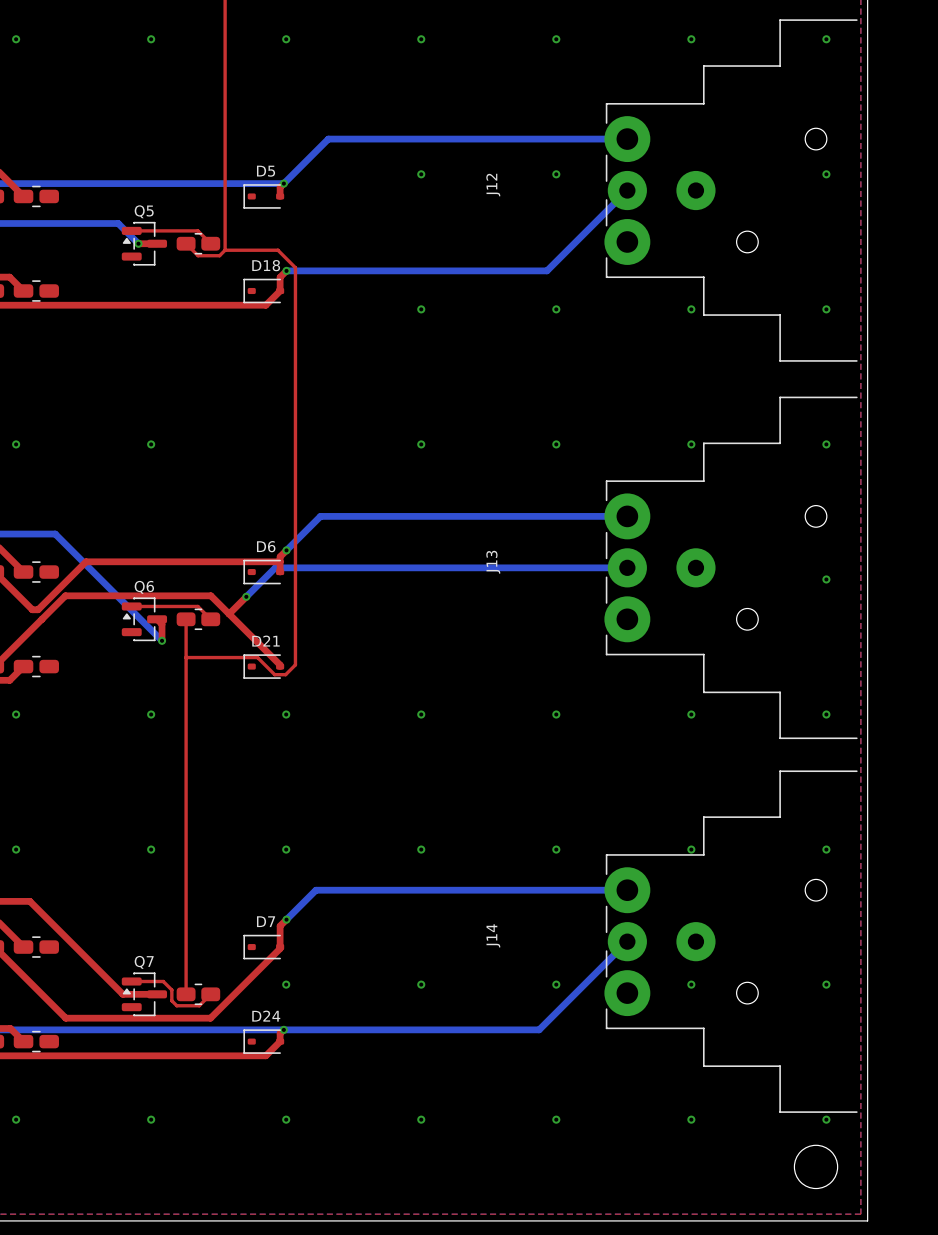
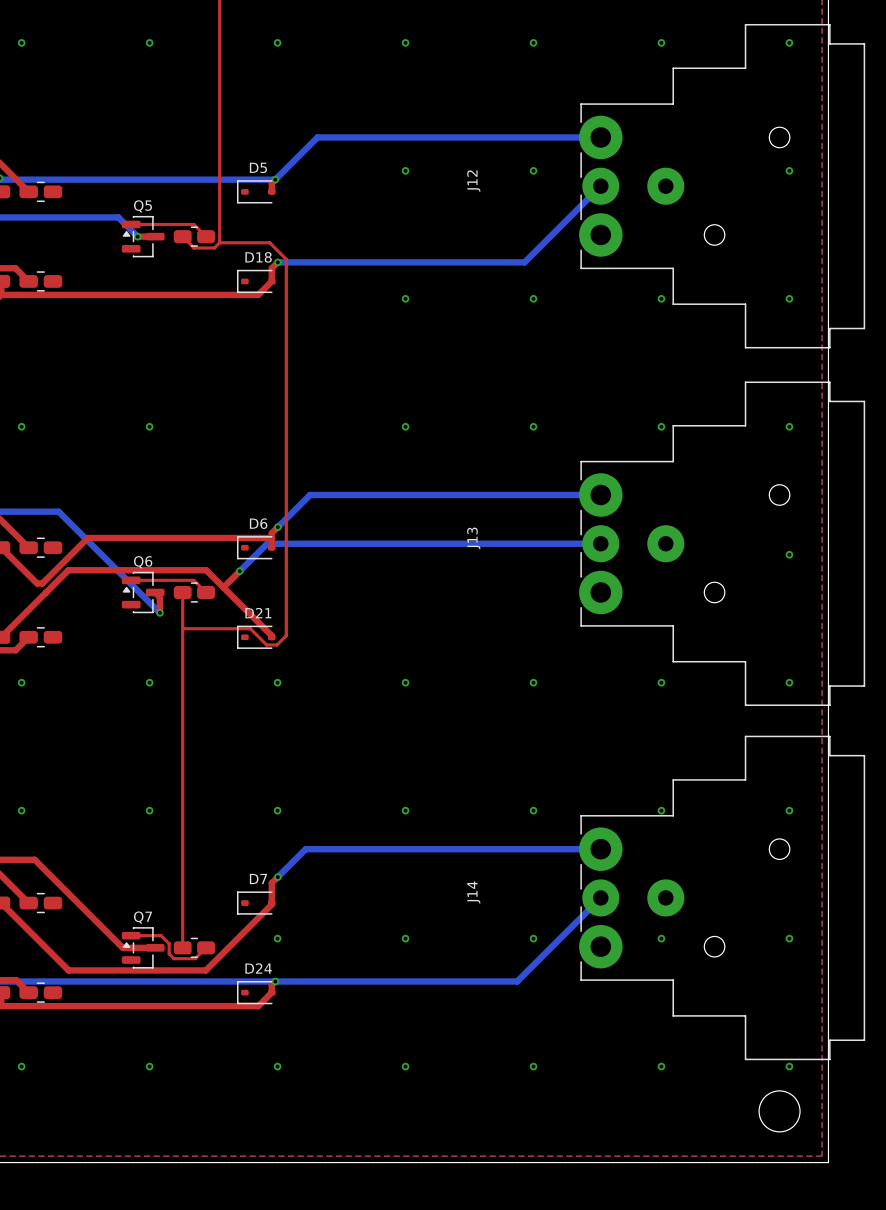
J12 footprint: [604, 19, 858, 362] -> [579, 23, 866, 349]
J13 footprint: [604, 396, 858, 740] -> [579, 381, 866, 707]
J14 footprint: [604, 770, 858, 1113] -> [579, 735, 866, 1061]

